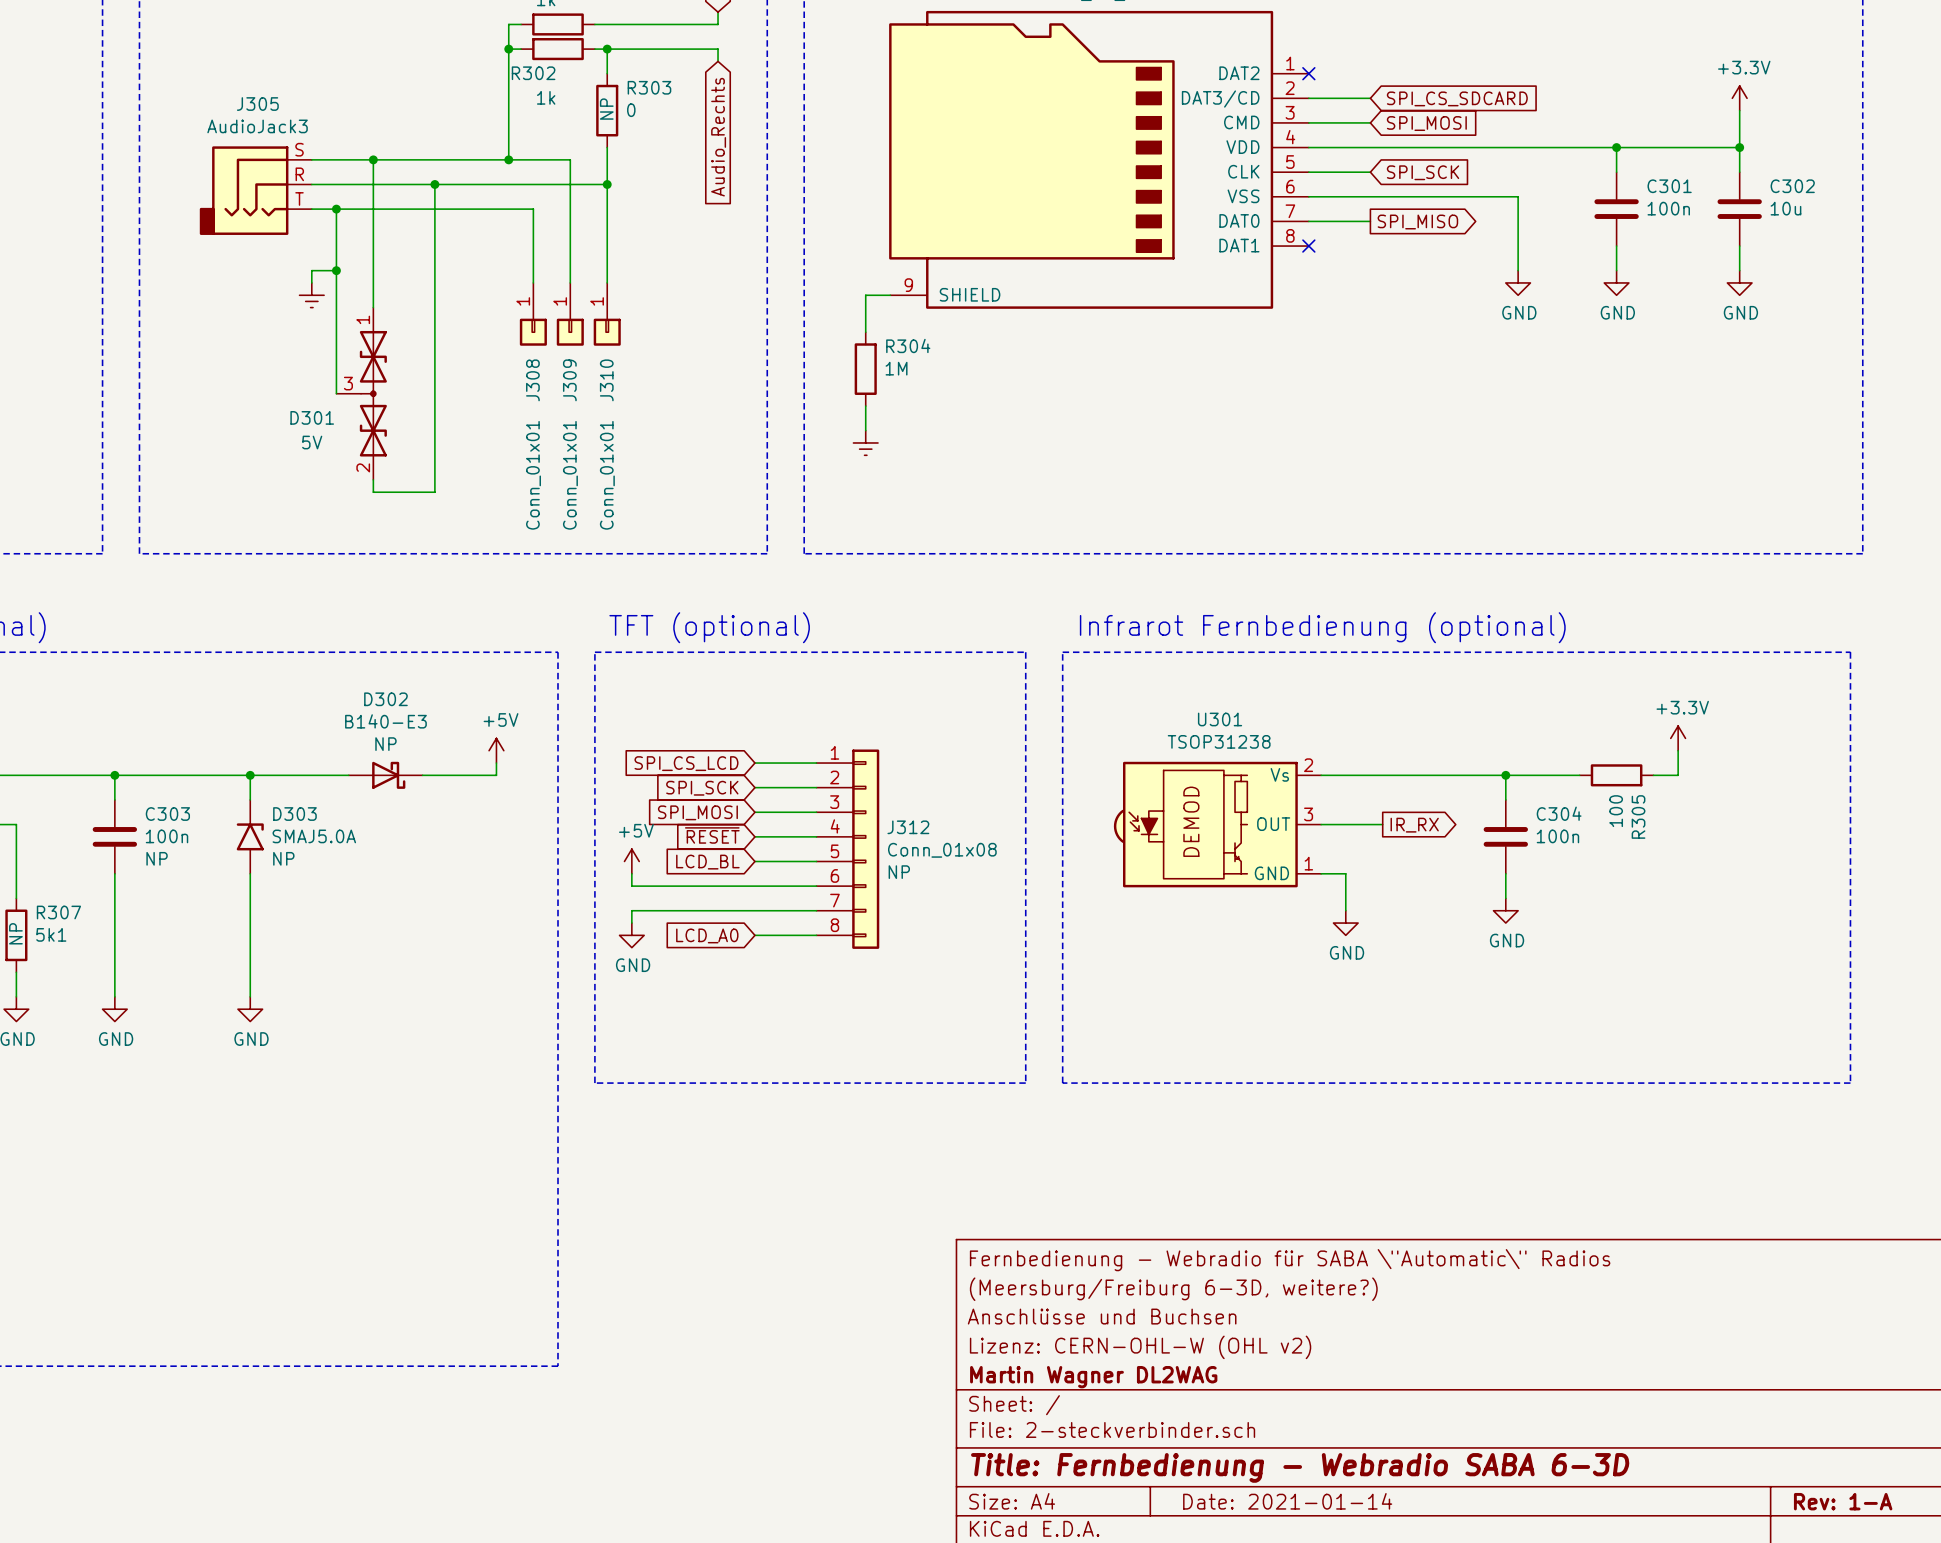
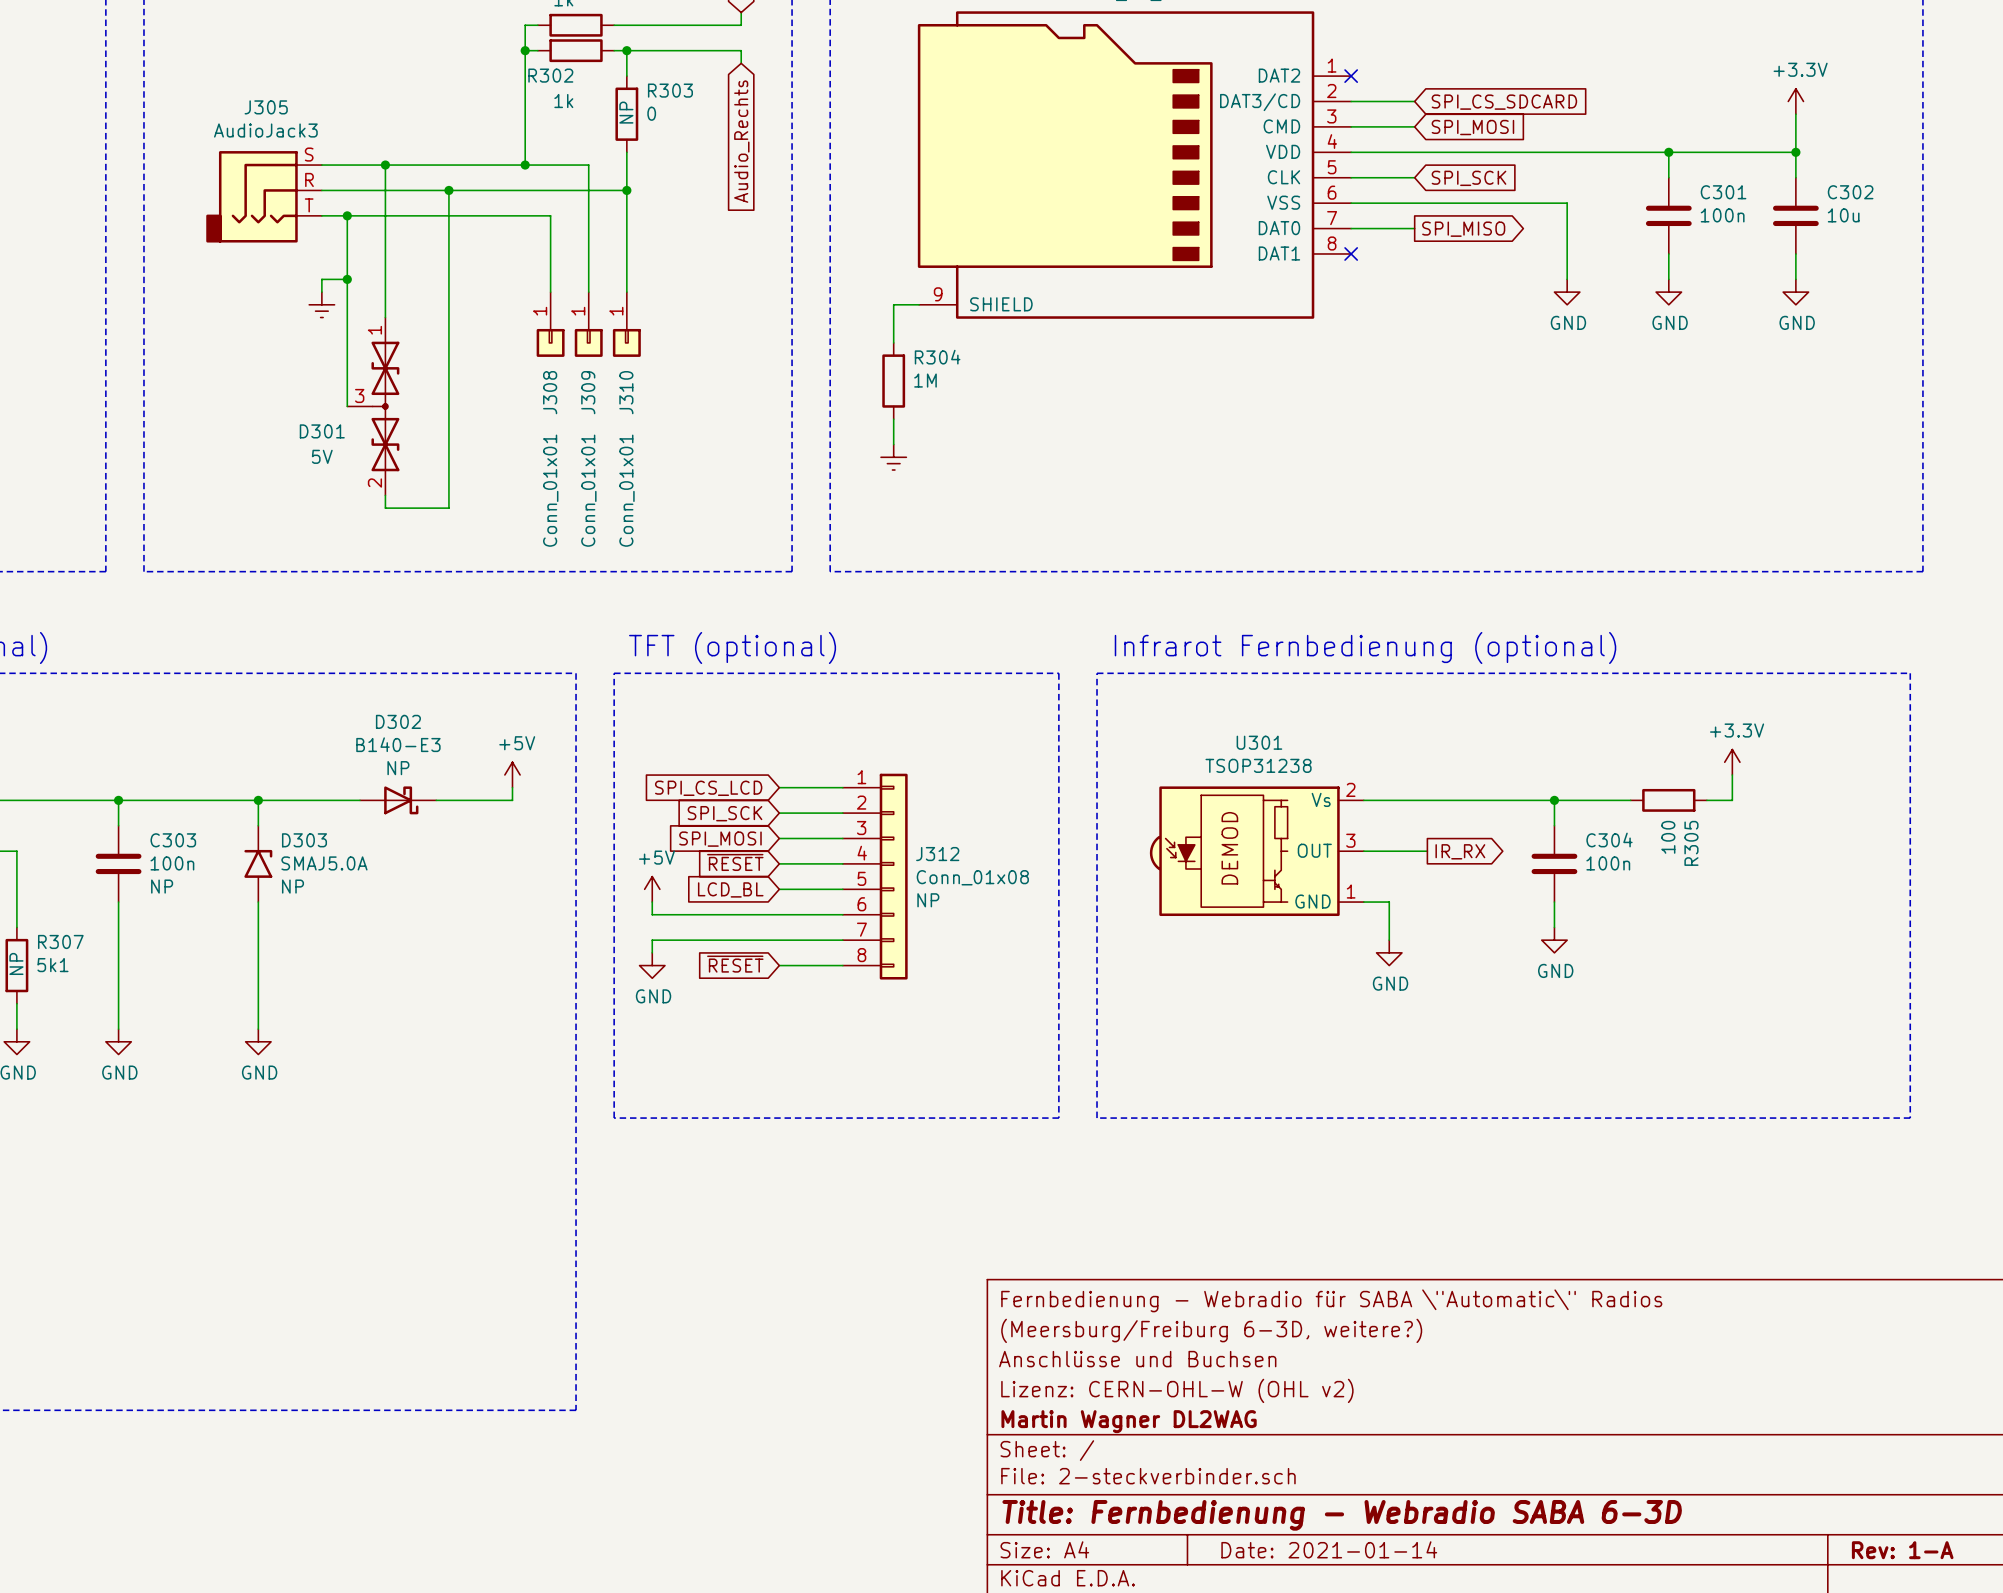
global label: LCD_A0 (707, 935) -> ~{RESET} (735, 964)

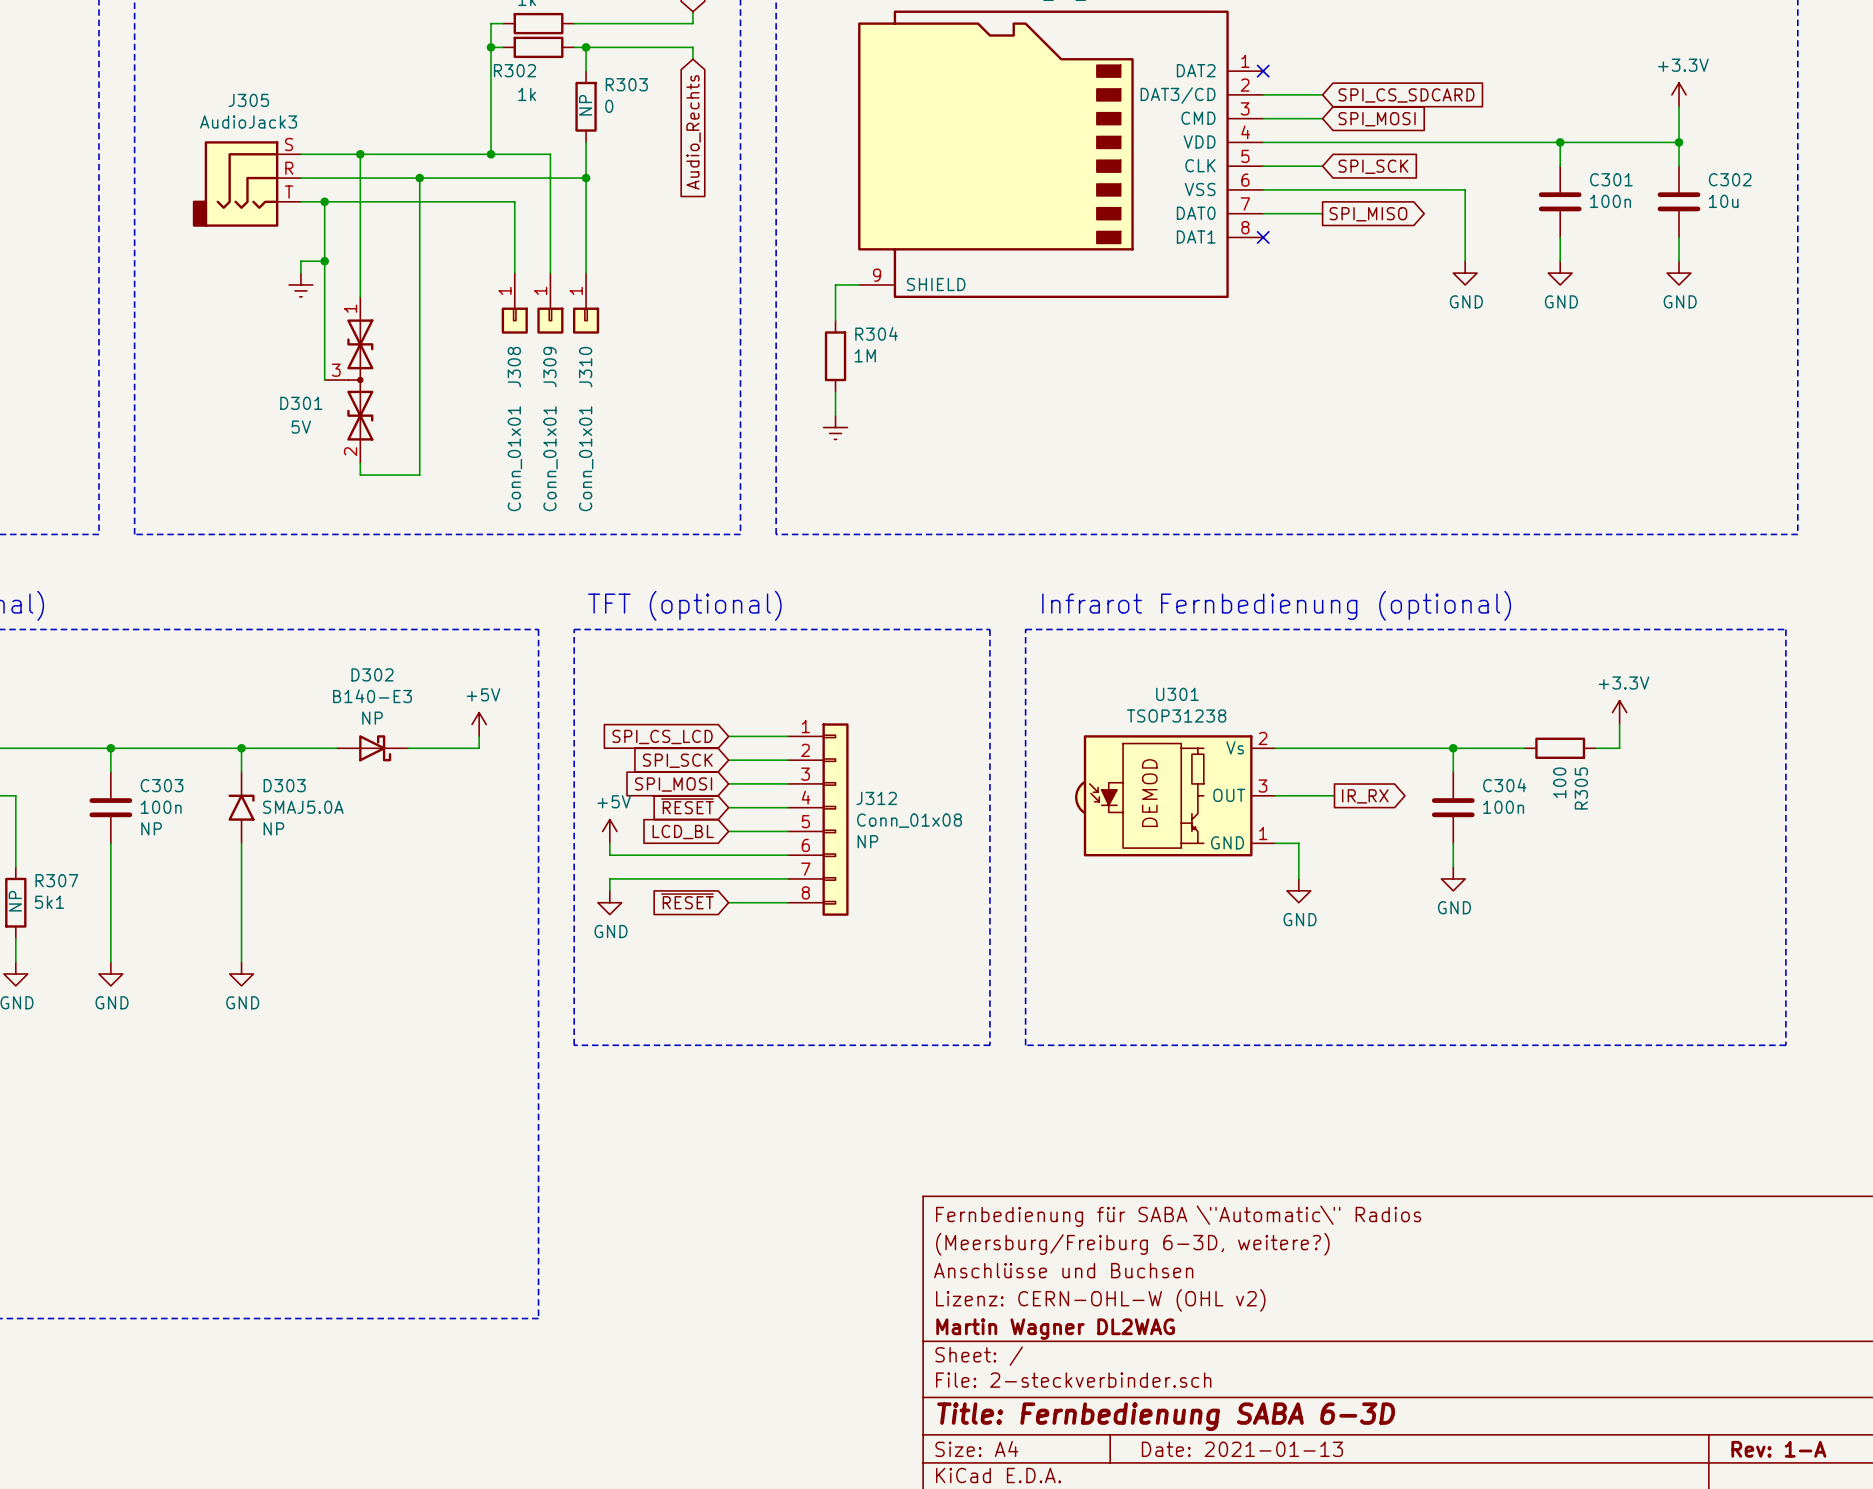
title block: Fernbedienung - Webradio für SABA \"Automatic\" Radios (1331, 1300) -> Fernbedienung für SABA \"Automatic\" Radios (1178, 1216)
title block: Title: Fernbedienung - Webradio SABA 6-3D (1342, 1515) -> Title: Fernbedienung SABA 6-3D (1166, 1416)
title block: Date: 2021-01-14 (1329, 1549) -> Date: 2021-01-13 (1242, 1449)

